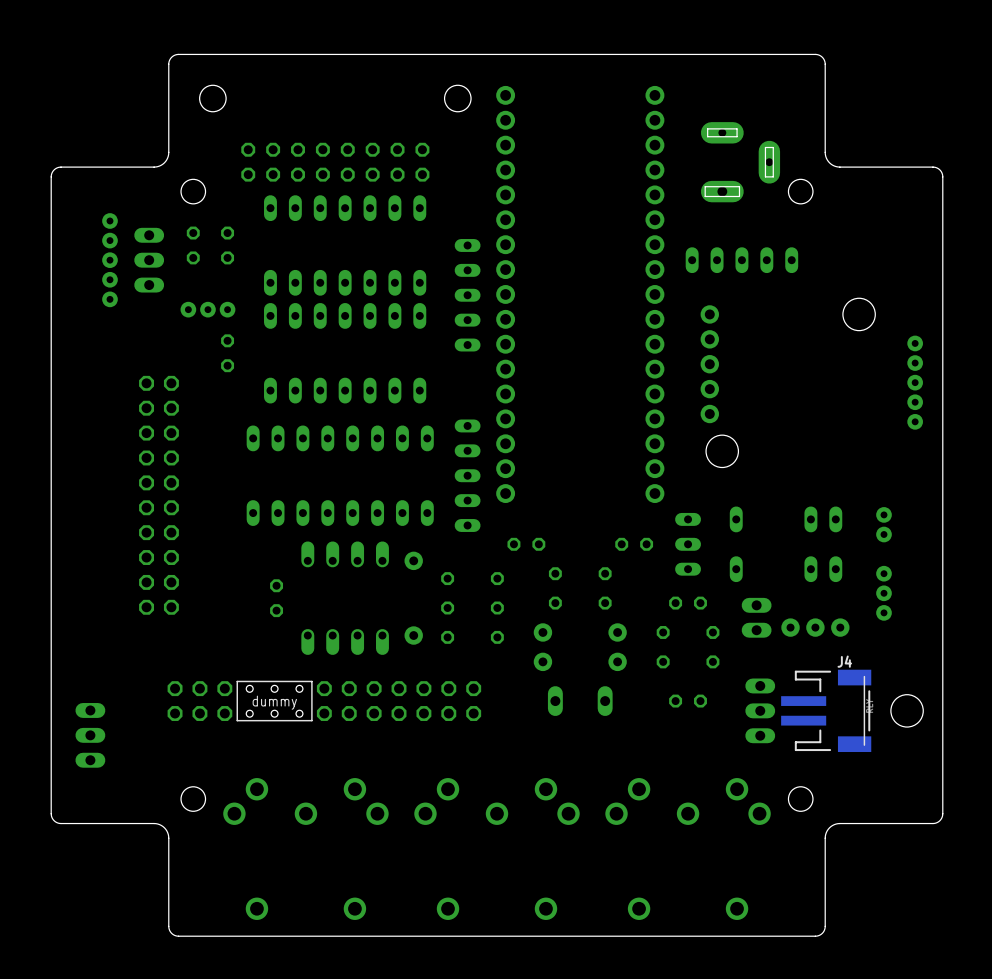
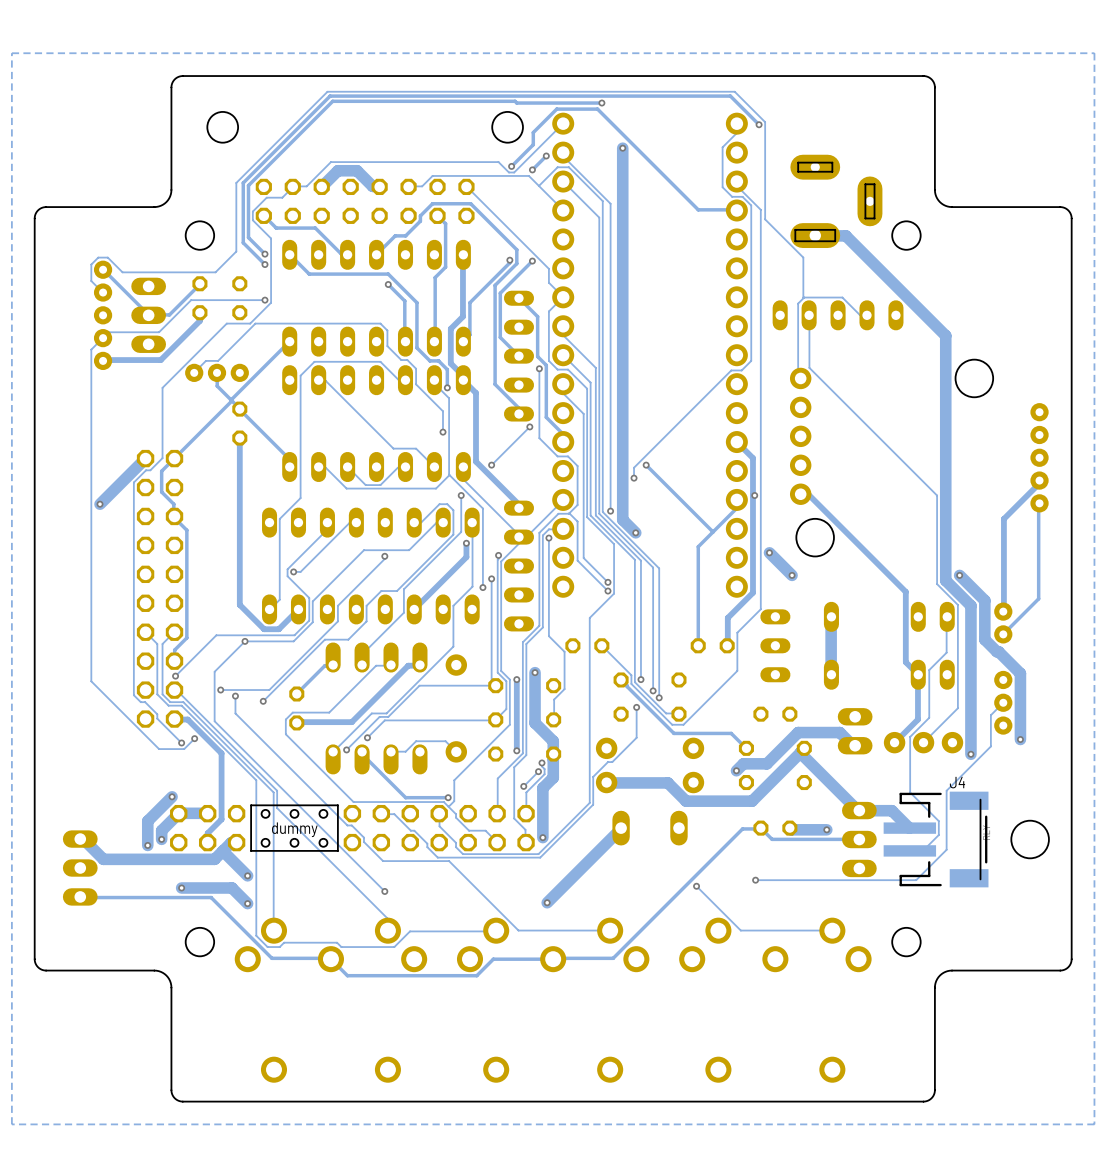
zone outline: none -> (1094, 53) (11, 53) (11, 1124) (1094, 1124) (1094, 53)
track: none -> (601, 103) (332, 101) (248, 185) (248, 237) (264, 254)
via: none -> (601, 103)
track: none -> (563, 123) (514, 172) (508, 172) (498, 162) (330, 162) (306, 186) (293, 186) (282, 197) (266, 197) (252, 211) (252, 220) (271, 238) (271, 302) (250, 323) (226, 323) (162, 387) (162, 458) (133, 482) (133, 695) (140, 702) (145, 702) (157, 714) (157, 718) (181, 742)
track: none -> (736, 123) (736, 133) (722, 147) (722, 187) (732, 196) (742, 196) (751, 205) (751, 360) (741, 370) (731, 370) (634, 467) (634, 478)
track: none -> (759, 124) (730, 96) (330, 96) (243, 182) (243, 242) (264, 264)
via: none -> (759, 124)
track: none -> (622, 148) (622, 519) (635, 532)
via: none -> (622, 148)
track: none -> (563, 152) (563, 156) (610, 203) (610, 511)
track: none -> (546, 156) (532, 169)
via: none -> (546, 156)
track: none -> (511, 166) (533, 144) (533, 132) (556, 109) (597, 109) (698, 209) (736, 210)
via: none -> (511, 166)
via: none -> (532, 169)
track: none -> (563, 181) (599, 217) (599, 513) (653, 567) (653, 690)
track: none -> (736, 181) (737, 186) (760, 209) (760, 609) (737, 632) (737, 670) (683, 724) (672, 724) (631, 683) (631, 675) (601, 645)
track: none -> (538, 185) (557, 167) (568, 167) (602, 201) (602, 512) (659, 568) (659, 697)
track: none -> (379, 186) (372, 186) (357, 170) (337, 170) (321, 186)
track: none -> (408, 186) (422, 186) (432, 175) (528, 175) (563, 210)
track: none -> (466, 186) (548, 268) (548, 282) (563, 297) (548, 311) (548, 360) (557, 369) (568, 369) (587, 388) (587, 517) (614, 544) (614, 593) (589, 617) (589, 802) (538, 854) (462, 854) (456, 847) (456, 842) (439, 826) (439, 813)
track: none -> (263, 215) (276, 228) (315, 228) (341, 254) (347, 254)
track: none -> (437, 215) (445, 223) (445, 267) (435, 277) (434, 341)
track: none -> (815, 235) (845, 235) (945, 335) (945, 580) (970, 605) (970, 754)
via: none -> (264, 254)
track: none -> (289, 254) (309, 274) (388, 274) (416, 302) (416, 347) (429, 360) (438, 360) (447, 369) (447, 387)
track: none -> (376, 254) (395, 235) (405, 235) (420, 221) (420, 215) (432, 203) (470, 203) (516, 249) (516, 263) (495, 285) (495, 384) (518, 407) (518, 414)
track: none -> (463, 254) (462, 316) (450, 328) (450, 363) (475, 393) (475, 461) (518, 504) (518, 508)
track: none -> (509, 260) (509, 262) (469, 302) (469, 334) (463, 341)
via: none -> (509, 260)
track: none -> (532, 261) (500, 293) (500, 337) (518, 356)
via: none -> (532, 261)
via: none -> (264, 264)
track: none -> (103, 269) (148, 315) (169, 314) (199, 283)
track: none -> (388, 284) (404, 301) (405, 341)
via: none -> (388, 284)
track: none -> (103, 292) (91, 281) (91, 264) (98, 257) (107, 257) (122, 272) (215, 272) (236, 251) (236, 182) (327, 91) (734, 91) (765, 122) (765, 219) (803, 257) (803, 297)
track: none -> (518, 298) (537, 316) (537, 356) (546, 365) (546, 417) (562, 433) (563, 442)
track: none -> (264, 300) (191, 300) (159, 332) (108, 332) (91, 349) (91, 681) (159, 749) (184, 749) (194, 738)
via: none -> (264, 300)
track: none -> (199, 312) (199, 320) (160, 360) (103, 360)
track: none -> (809, 315) (809, 367) (937, 495) (937, 584) (957, 604) (957, 708) (923, 742)
track: none -> (867, 315) (859, 314) (842, 297) (804, 297) (798, 303) (798, 376) (800, 378)
track: none -> (563, 326) (563, 335) (595, 367) (595, 515) (640, 560) (640, 679)
track: none -> (289, 341) (231, 400)
track: none -> (563, 355) (590, 382) (590, 515) (634, 559) (634, 682) (666, 713) (678, 714)
track: none -> (539, 368) (539, 438) (557, 456) (568, 456) (577, 465) (577, 505) (568, 513) (558, 513) (539, 532) (539, 625) (522, 642) (522, 753) (497, 778) (497, 813)
via: none -> (539, 368)
track: none -> (194, 372) (205, 360) (218, 360) (255, 323) (380, 323) (387, 330) (387, 346) (401, 360) (407, 360) (416, 368) (416, 384) (443, 411) (443, 432)
track: none -> (217, 372) (217, 386) (289, 459) (289, 467)
track: none -> (318, 380) (325, 380) (393, 448) (416, 448) (434, 466)
track: none -> (405, 380) (398, 380) (380, 361) (314, 361) (300, 375) (300, 498) (279, 518) (279, 599) (269, 609)
track: none -> (434, 380) (435, 384) (449, 398) (449, 474) (482, 508) (482, 587)
track: none -> (563, 384) (563, 393) (583, 413) (583, 558) (607, 582)
via: none -> (447, 387)
track: none -> (231, 400) (161, 471) (161, 492) (173, 504) (173, 516) (186, 530) (186, 637) (174, 650) (174, 661)
track: none -> (529, 426) (491, 465)
via: none -> (529, 426)
via: none -> (443, 432)
track: none -> (239, 438) (239, 604) (264, 629) (278, 629) (298, 609)
track: none -> (736, 442) (752, 458) (752, 592) (727, 617) (727, 645)
track: none -> (145, 458) (100, 504)
via: none -> (491, 465)
track: none -> (646, 465) (713, 531)
via: none -> (646, 465)
track: none -> (318, 467) (325, 467) (346, 488) (436, 488) (449, 475)
track: none -> (405, 467) (397, 467) (380, 485) (365, 485) (347, 467)
track: none -> (463, 467) (463, 479) (518, 537)
via: none -> (634, 478)
track: none -> (1039, 480) (1038, 484) (1003, 518) (1003, 611)
track: none -> (800, 494) (808, 494) (905, 591) (905, 662) (918, 674) (917, 719) (894, 742)
track: none -> (461, 495) (461, 531) (403, 589) (403, 612) (362, 654) (362, 665)
via: none -> (461, 495)
via: none -> (754, 495)
track: none -> (563, 499) (527, 536) (518, 537)
track: none -> (736, 499) (736, 508) (698, 546) (698, 645)
track: none -> (1039, 503) (1038, 598) (1003, 634)
via: none -> (100, 504)
via: none -> (610, 511)
track: none -> (569, 513) (577, 521) (577, 560) (607, 591)
track: none -> (327, 522) (326, 530) (287, 569) (287, 576) (309, 597) (309, 620) (294, 635) (216, 635) (175, 676)
track: none -> (356, 522) (349, 523) (300, 571) (293, 571)
track: none -> (414, 522) (421, 522) (439, 504) (447, 504) (453, 510) (453, 534) (396, 591) (381, 591) (366, 605) (366, 621) (348, 639) (324, 639) (263, 701)
track: none -> (443, 522) (436, 523) (409, 550) (363, 550) (312, 601) (312, 622) (293, 641) (245, 641) (214, 671) (214, 721) (384, 891)
track: none -> (472, 522) (472, 586) (453, 605) (453, 646) (386, 713) (371, 713) (333, 751)
track: none -> (563, 528) (548, 529) (542, 535) (542, 627) (526, 644) (526, 755) (514, 767) (514, 818) (525, 829) (526, 842)
via: none -> (635, 532)
track: none -> (518, 537) (518, 544) (501, 561) (501, 670) (509, 679) (509, 724) (454, 780) (454, 801) (448, 806)
track: none -> (548, 538) (548, 636) (564, 651) (564, 689) (554, 699) (553, 719)
via: none -> (548, 538)
track: none -> (466, 543) (466, 557) (414, 609)
via: none -> (466, 543)
track: none -> (769, 552) (792, 575)
via: none -> (769, 552)
track: none -> (498, 555) (497, 672) (506, 681) (506, 709) (495, 720) (384, 720) (367, 737)
via: none -> (498, 555)
track: none -> (384, 556) (384, 558) (337, 605) (337, 621) (269, 690) (220, 690)
via: none -> (384, 556)
via: none -> (293, 571)
via: none -> (792, 575)
track: none -> (959, 575) (984, 600) (984, 639) (1020, 673) (1020, 739)
via: none -> (959, 575)
track: none -> (491, 578) (491, 685) (495, 685) (495, 685) (419, 685) (388, 716) (379, 716) (346, 749)
via: none -> (491, 578)
via: none -> (607, 582)
via: none -> (482, 587)
via: none -> (607, 591)
track: none -> (831, 616) (831, 674)
track: none -> (947, 616) (946, 652) (929, 670) (929, 717) (910, 736) (910, 792) (938, 821) (938, 835) (923, 850) (909, 850)
track: none -> (145, 632) (157, 644) (157, 694) (168, 705) (181, 705) (256, 780) (256, 935) (267, 947) (279, 947) (284, 942) (337, 942) (341, 947) (394, 947) (410, 931) (496, 930)
track: none -> (174, 632) (162, 644) (162, 694) (170, 702) (183, 702) (273, 792) (273, 930)
via: none -> (245, 641)
track: none -> (333, 665) (324, 665) (296, 693)
track: none -> (391, 665) (376, 665) (329, 712) (292, 712) (285, 719) (285, 734) (353, 802) (443, 802) (469, 830) (485, 830) (497, 842)
track: none -> (419, 665) (408, 665) (351, 722) (296, 722)
track: none -> (535, 672) (535, 723) (553, 741) (553, 777) (542, 788) (542, 837)
via: none -> (535, 672)
via: none -> (175, 676)
track: none -> (516, 679) (516, 750)
via: none -> (516, 679)
track: none -> (621, 679) (673, 733) (731, 733) (746, 748)
via: none -> (640, 679)
track: none -> (174, 690) (277, 790) (277, 808) (387, 918) (387, 930)
via: none -> (220, 690)
via: none -> (653, 690)
track: none -> (235, 696) (235, 713) (347, 825) (351, 825) (363, 837) (363, 841) (383, 861) (449, 861) (518, 930) (610, 930)
via: none -> (235, 696)
via: none -> (659, 697)
via: none -> (263, 701)
track: none -> (1003, 702) (990, 715) (990, 746) (946, 790) (946, 849) (916, 880) (755, 880)
track: none -> (636, 707) (636, 737) (612, 762) (607, 762) (593, 776) (593, 804) (540, 857) (437, 857) (427, 847) (427, 843) (394, 814) (381, 813)
via: none -> (636, 707)
track: none -> (174, 719) (187, 719) (221, 753) (221, 819) (207, 833) (207, 842)
via: none -> (367, 737)
via: none -> (194, 738)
via: none -> (1020, 739)
via: none -> (181, 742)
track: none -> (855, 745) (839, 732) (798, 732) (766, 763) (743, 763) (736, 770)
track: none -> (804, 748) (752, 801) (686, 801) (667, 782) (606, 782)
via: none -> (346, 749)
via: none -> (516, 750)
track: none -> (362, 751) (362, 754) (405, 797) (448, 797)
track: none -> (456, 751) (445, 741) (416, 741) (405, 751) (391, 751)
track: none -> (800, 752) (859, 810) (891, 810) (909, 828)
via: none -> (970, 754)
track: none -> (541, 762) (544, 774) (526, 792) (526, 813)
via: none -> (541, 762)
via: none -> (736, 770)
track: none -> (538, 771) (523, 786)
via: none -> (538, 771)
via: none -> (523, 786)
track: none -> (172, 796) (147, 821) (147, 845)
via: none -> (172, 796)
via: none -> (448, 797)
track: none -> (207, 813) (178, 813) (161, 830) (161, 839)
track: none -> (621, 828) (547, 902)
track: none -> (789, 828) (791, 829) (826, 829)
via: none -> (826, 829)
via: none -> (542, 837)
track: none -> (80, 839) (83, 839) (103, 859) (214, 859) (231, 842) (236, 842)
via: none -> (161, 839)
track: none -> (859, 839) (772, 839) (760, 828) (742, 828) (613, 958) (493, 959) (476, 975) (347, 975) (330, 958) (271, 958) (211, 897) (80, 896)
via: none -> (147, 845)
track: none -> (222, 851) (247, 875)
via: none -> (247, 875)
via: none -> (755, 880)
track: none -> (696, 886) (740, 930) (832, 930)
via: none -> (696, 886)
track: none -> (181, 887) (231, 887) (247, 903)
via: none -> (181, 887)
via: none -> (384, 891)
via: none -> (247, 903)
via: none -> (547, 902)

